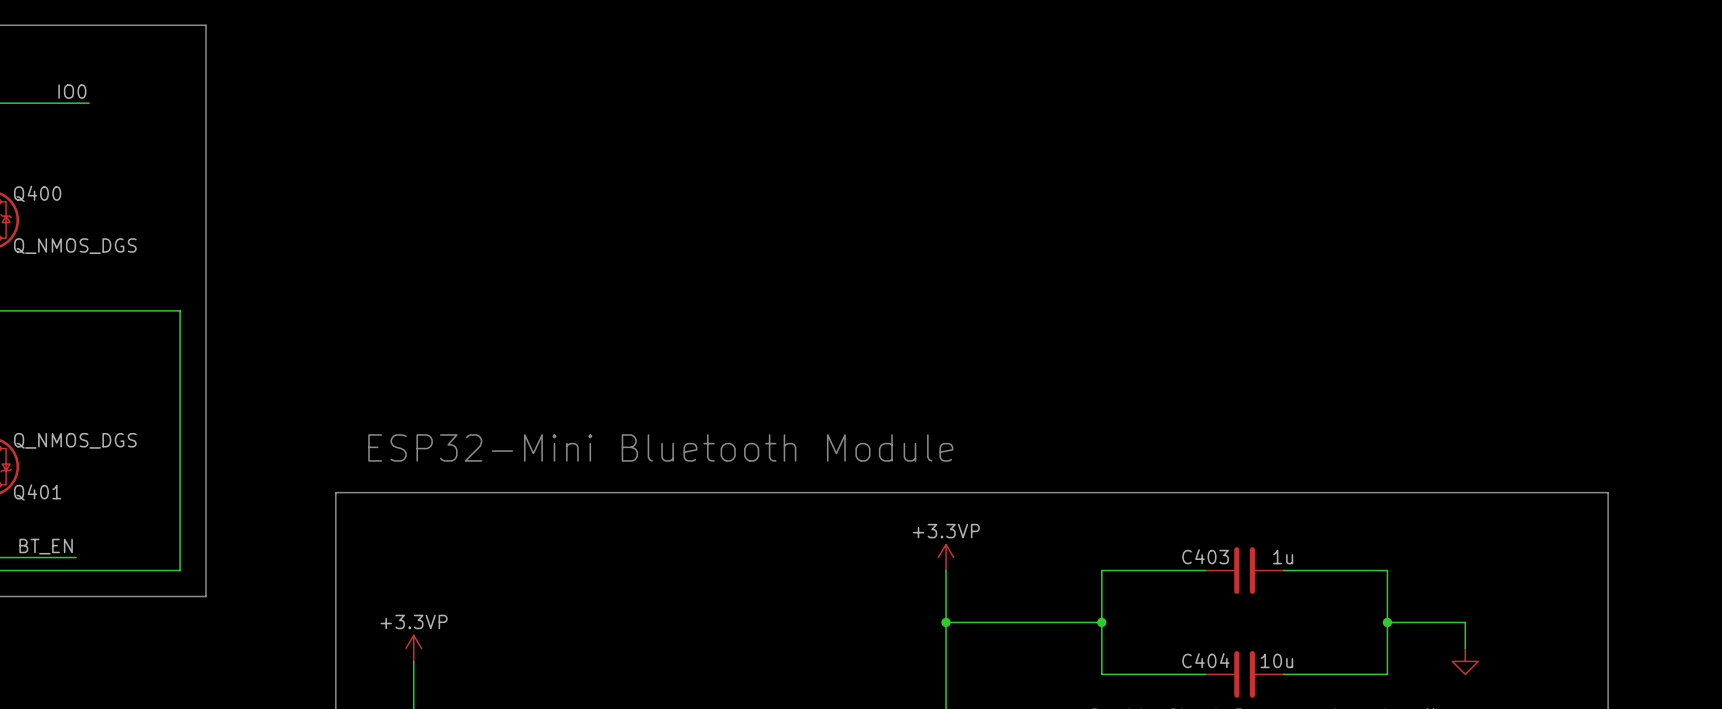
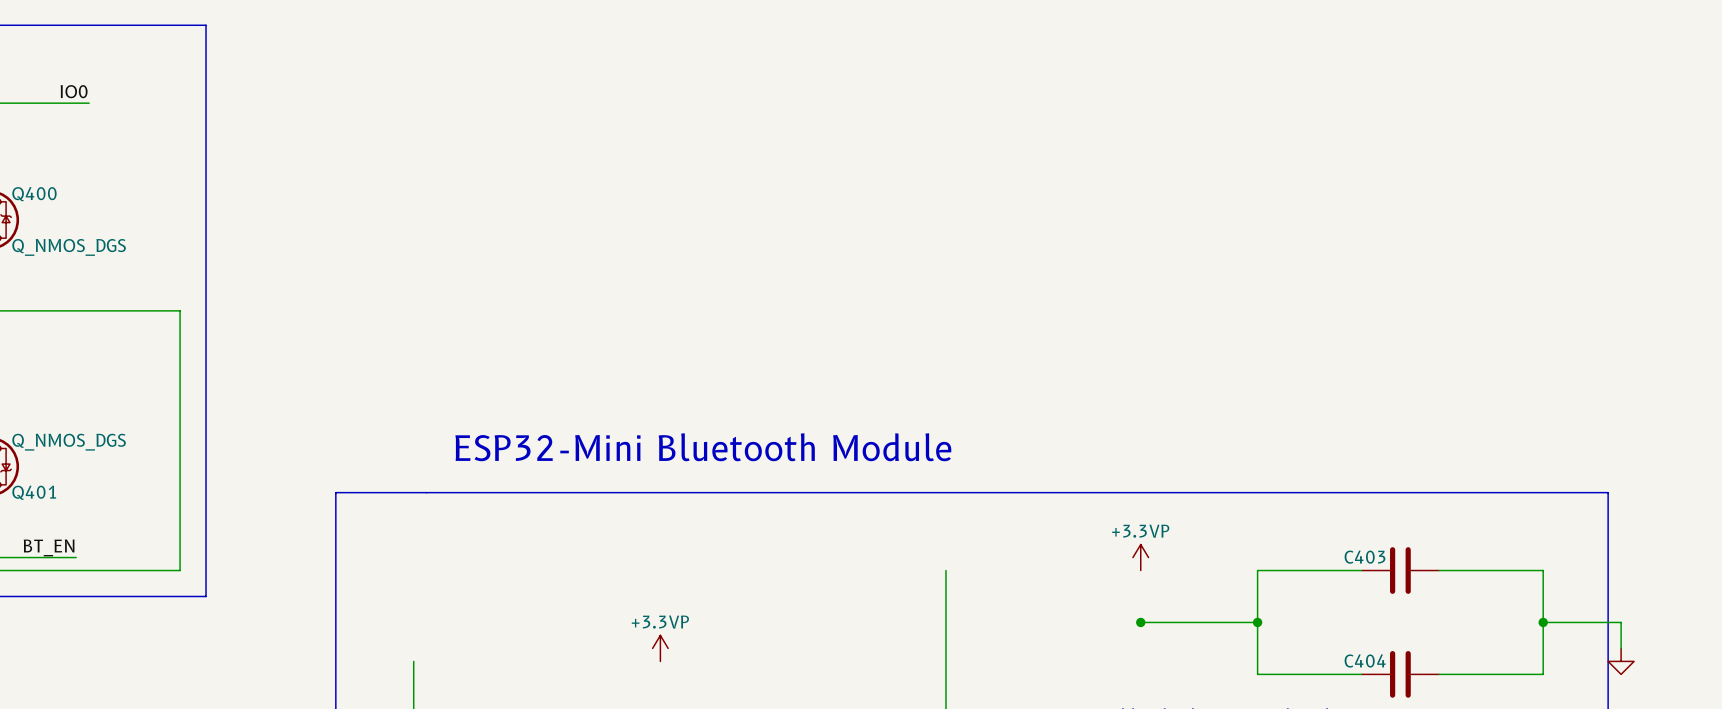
text position: ESP32-Mini Bluetooth Module (660, 447) -> ESP32-Mini Bluetooth Module (703, 447)
power symbol: +3.3VP (946, 557) -> none
power symbol: none -> +3.3VP (1140, 557)
C403 value: 1u (1283, 557) -> none
wire: (1205, 570) (1101, 570) (1101, 674) (1205, 674) -> none
C403 position: (1244, 570) -> (1400, 570)
wire: none -> (1283, 570) (1257, 570) (1257, 674) (1283, 674)
wire: (1361, 570) (1387, 570) (1387, 674) (1361, 674) -> none
wire: none -> (1439, 570) (1543, 570) (1543, 674) (1439, 674)
wire: (946, 622) (1101, 622) -> none
junction: (946, 622) -> none
junction position: (1101, 622) -> (1140, 622)
wire: none -> (1140, 622) (1257, 622)
junction: none -> (1257, 622)
wire: (1387, 622) (1465, 622) (1465, 648) -> (1543, 622) (1621, 622) (1621, 648)
junction: (1387, 622) -> none
junction: none -> (1543, 622)
power symbol: +3.3VP (413, 648) -> none
power symbol: none -> +3.3VP (660, 648)
C404 value: 10u (1276, 660) -> none
power symbol position: (1465, 661) -> (1621, 661)
C404 position: (1244, 674) -> (1400, 674)

